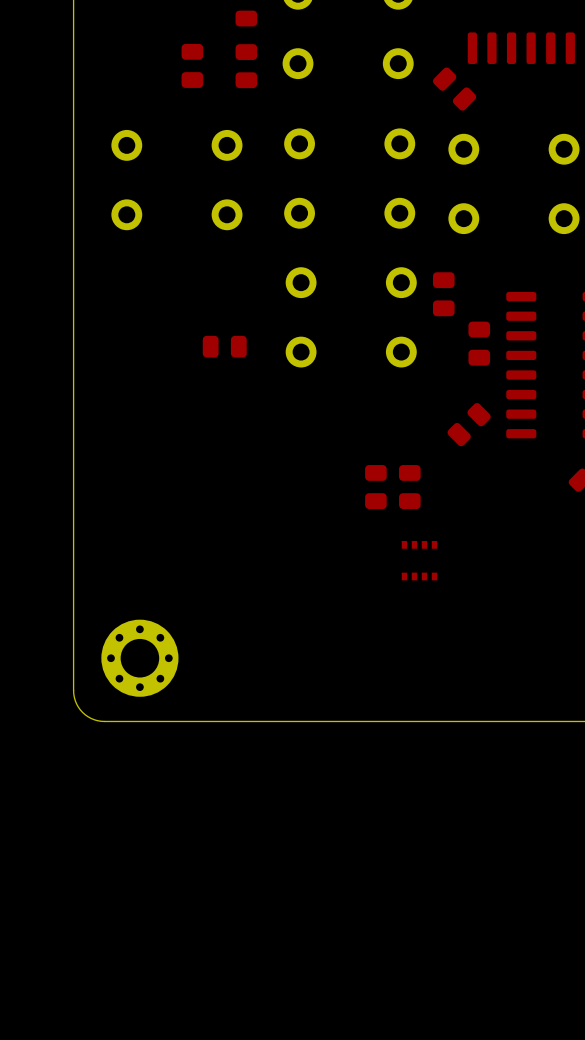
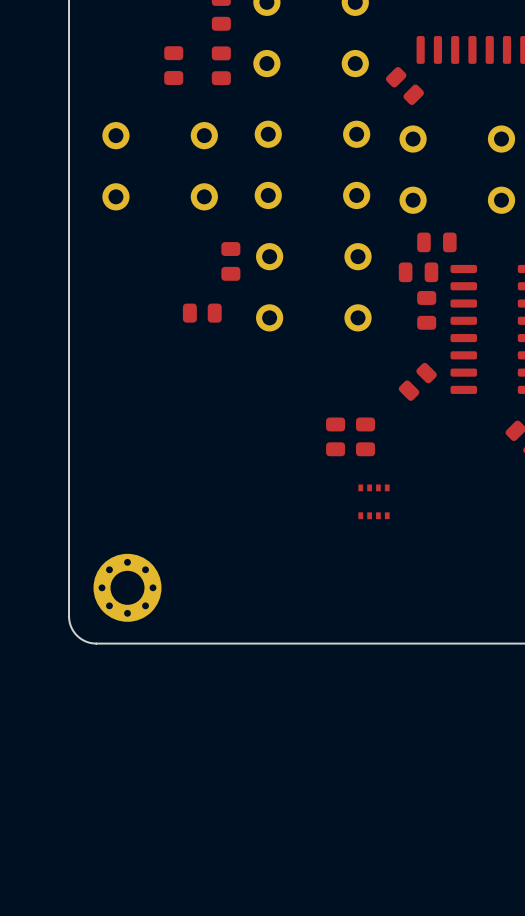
part: none -> (436, 242)
part position: (443, 294) -> (230, 261)
part: none -> (418, 272)

